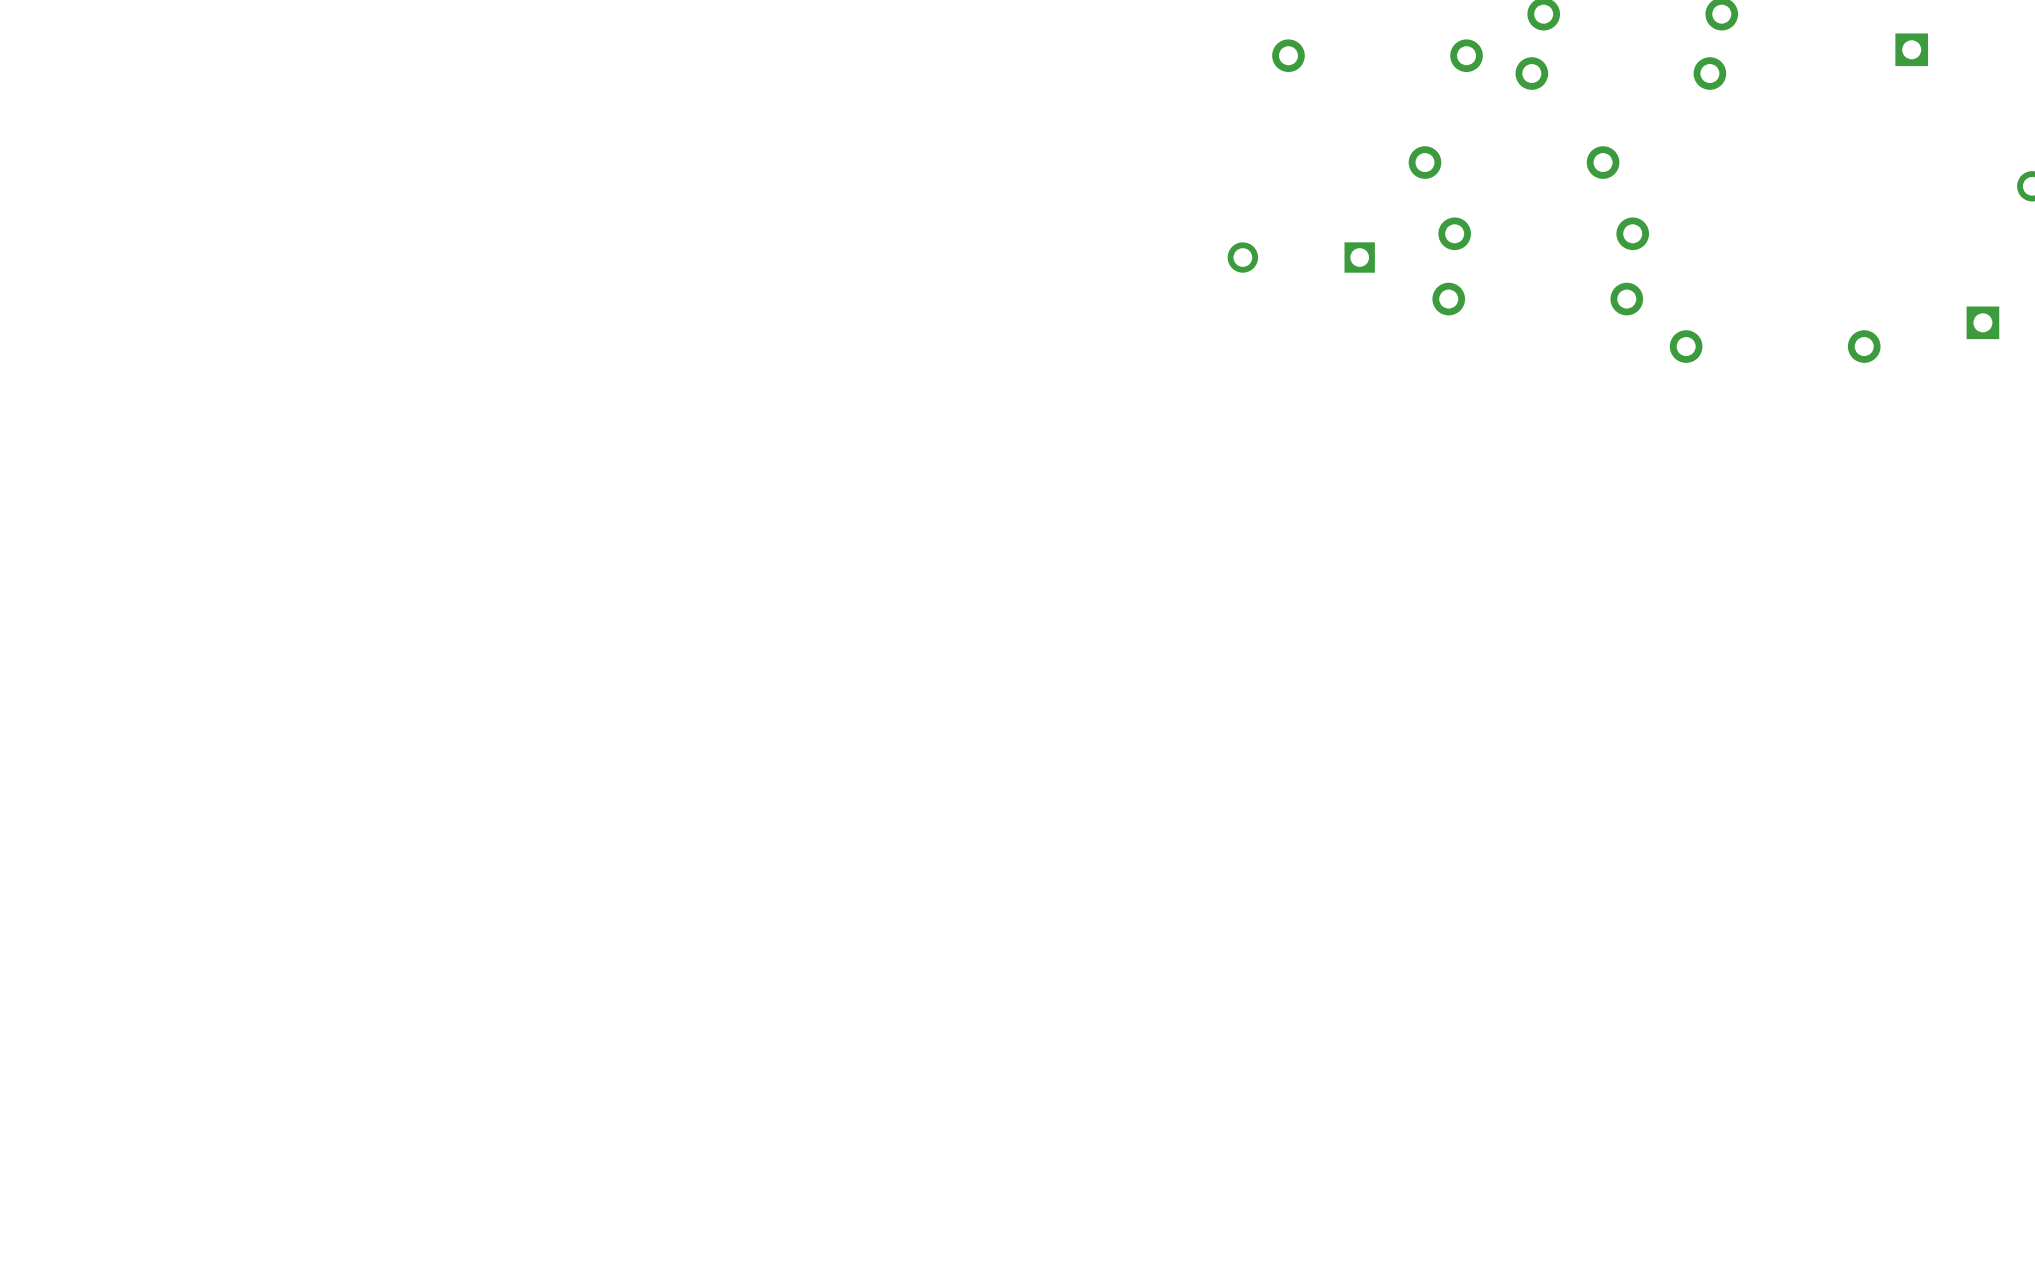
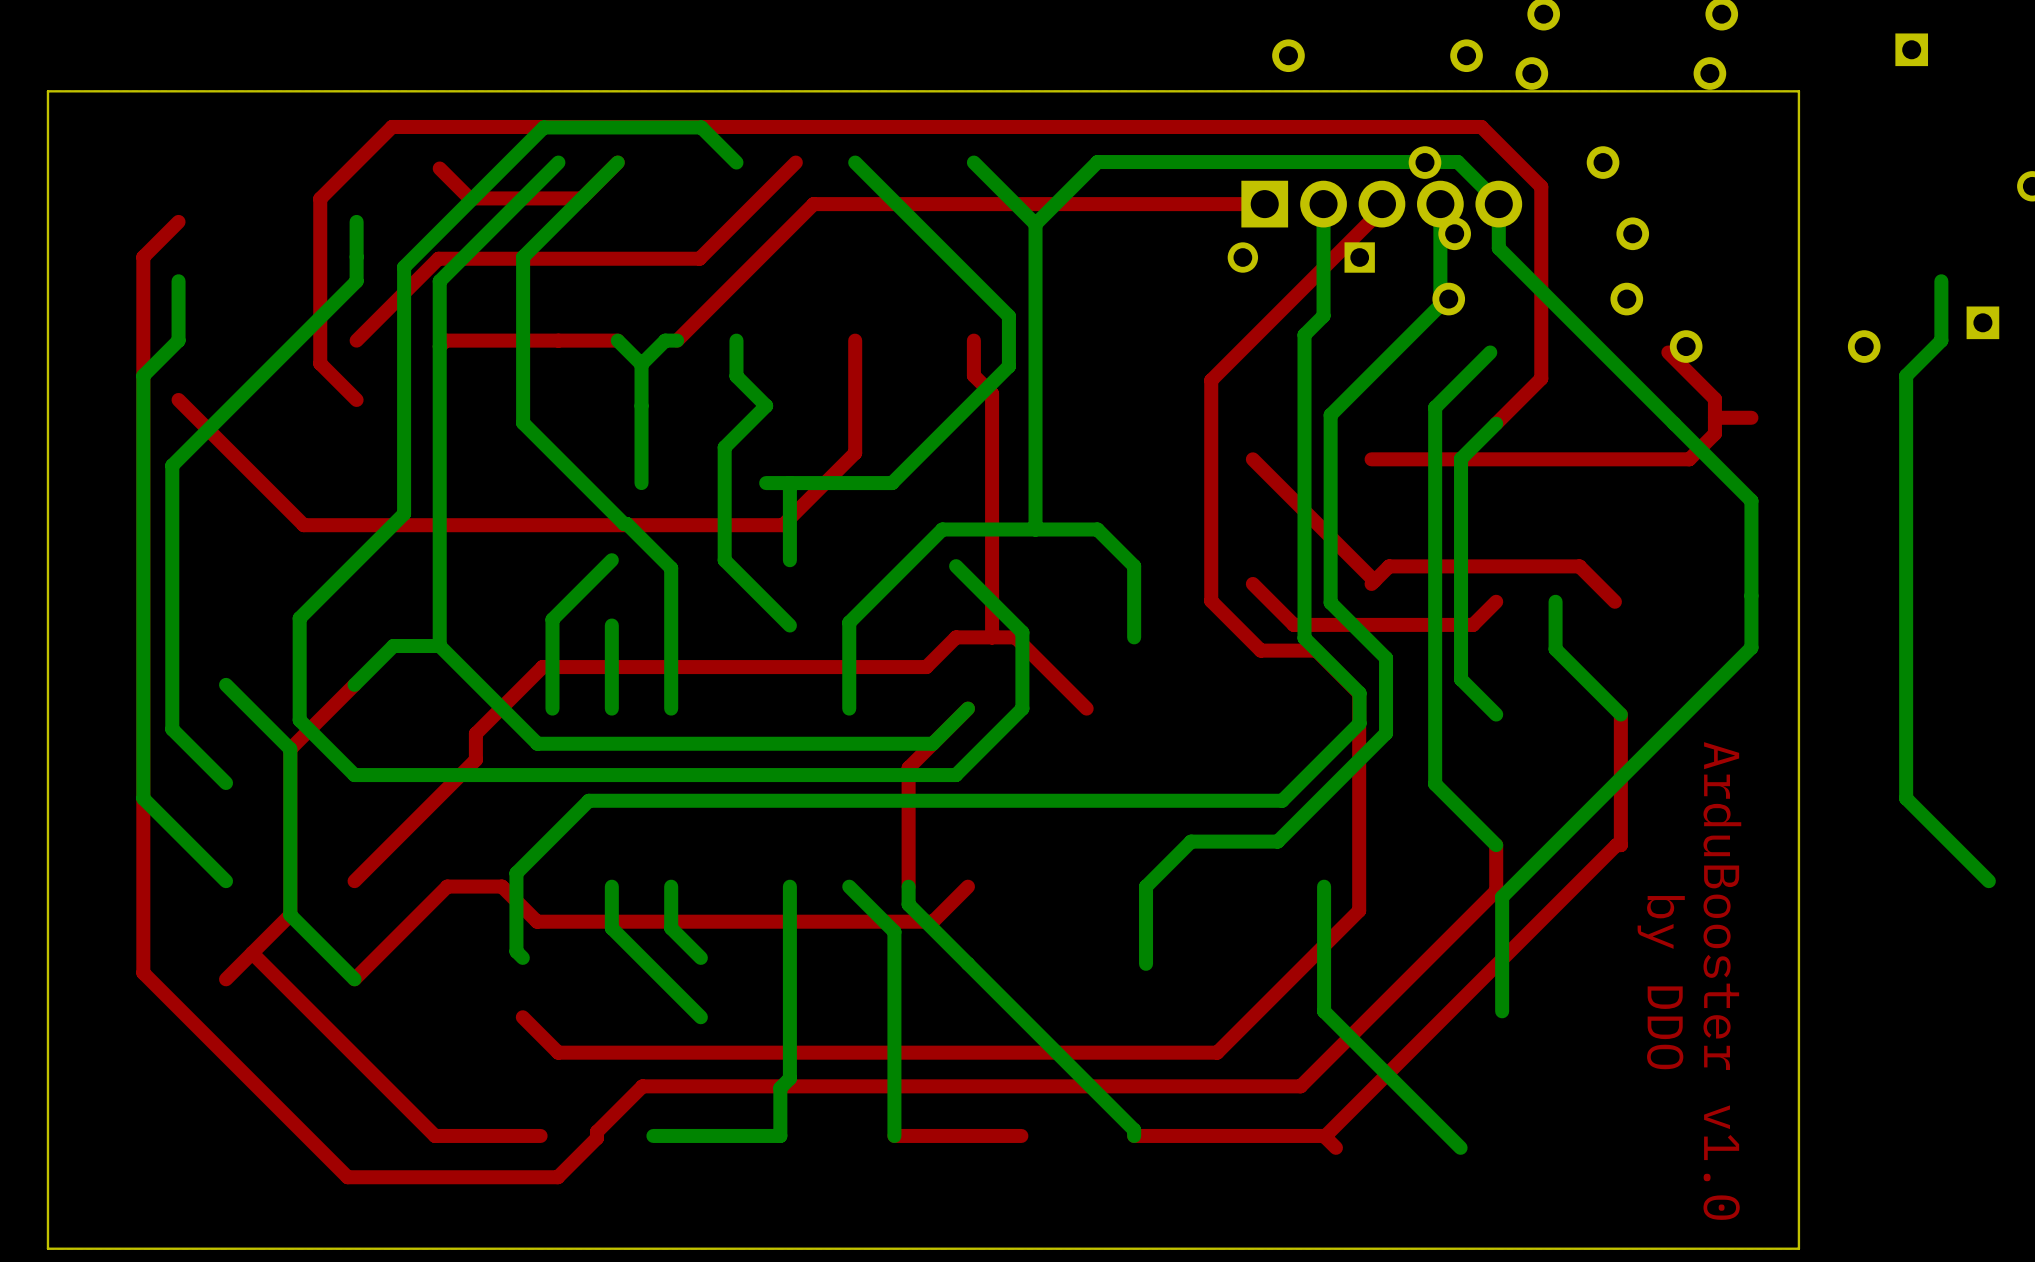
board edge: none -> (1798, 91) (1798, 1248) (47, 1248) (47, 91) (1798, 91)
bottom track: none -> (558, 162) (439, 281) (439, 646)
top track: none -> (617, 162) (581, 198) (469, 198) (439, 168)
bottom track: none -> (617, 162) (523, 257) (523, 423) (671, 568) (671, 708)
bottom track: none -> (736, 162) (701, 127) (543, 127) (404, 267) (404, 513) (299, 618) (299, 720) (354, 775) (955, 775) (1022, 708) (1022, 632) (956, 566)
top track: none -> (795, 162) (699, 258) (438, 258) (356, 340)
bottom track: none -> (855, 162) (1008, 316) (1008, 366) (892, 483) (766, 483)
bottom track: none -> (973, 162) (1035, 224)
top track: none -> (1264, 204) (813, 204) (677, 340)
bottom track: none -> (1323, 204) (1323, 315) (1304, 334) (1304, 638) (1359, 693) (1359, 723) (1282, 800) (588, 800) (516, 873) (516, 951) (522, 957)
top track: none -> (1381, 204) (1381, 209) (1211, 380) (1211, 600) (1260, 650) (1316, 650) (1359, 693) (1359, 910) (1217, 1052) (558, 1052) (522, 1017)
part: none -> (1381, 204)
bottom track: none -> (1440, 204) (1440, 305) (1330, 415) (1330, 602) (1386, 658) (1386, 733) (1277, 841) (1191, 841) (1146, 886) (1146, 963)
top track: none -> (178, 221) (143, 257) (143, 972) (347, 1177) (557, 1177) (597, 1138) (597, 1131) (642, 1086) (1300, 1086) (1496, 890) (1496, 845)
bottom track: none -> (356, 221) (356, 281) (172, 465) (172, 729) (226, 783)
bottom track: none -> (1035, 224) (1035, 529)
bottom track: none -> (1035, 224) (1097, 162) (1457, 162) (1498, 203) (1498, 248) (1751, 500) (1751, 647) (1502, 897) (1502, 1011)
bottom track: none -> (178, 281) (178, 340) (143, 375) (143, 798) (226, 881)
bottom track: none -> (1941, 281) (1941, 340) (1906, 375) (1906, 798) (1988, 881)
top track: none -> (617, 340) (445, 340) (439, 346)
bottom track: none -> (617, 340) (641, 364)
bottom track: none -> (677, 340) (665, 340) (641, 364)
bottom track: none -> (736, 340) (736, 376) (766, 405) (724, 447) (724, 560) (789, 625)
top track: none -> (855, 340) (855, 453) (783, 525) (303, 525) (178, 399)
top track: none -> (973, 340) (973, 375) (992, 393) (992, 637)
bottom track: none -> (1490, 352) (1435, 407) (1435, 784) (1496, 845)
top track: none -> (1668, 352) (1714, 399) (1714, 433) (1689, 459) (1371, 459)
bottom track: none -> (641, 364) (641, 483)
top track: none -> (356, 399) (320, 363) (320, 198) (392, 126) (1481, 126) (1541, 186) (1541, 378) (1496, 423)
top track: none -> (1751, 417) (1714, 417)
bottom track: none -> (1496, 423) (1461, 458) (1461, 679) (1496, 714)
top track: none -> (1252, 459) (1374, 581)
bottom track: none -> (789, 483) (789, 560)
bottom track: none -> (611, 560) (552, 619) (552, 708)
top track: none -> (1252, 583) (1293, 624) (1473, 624) (1496, 601)
top track: none -> (1371, 583) (1389, 566) (1579, 566) (1614, 601)
bottom track: none -> (1555, 601) (1555, 649) (1620, 714)
bottom track: none -> (611, 625) (611, 708)
bottom track: none -> (1134, 637) (1134, 566) (1097, 529) (942, 529) (849, 622) (849, 708)
bottom track: none -> (439, 646) (537, 743) (932, 743) (967, 708)
bottom track: none -> (439, 646) (393, 646) (354, 684)
bottom track: none -> (226, 684) (290, 749) (290, 915) (354, 979)
top track: none -> (354, 684) (290, 749) (290, 915) (226, 979)
top track: none -> (967, 708) (908, 767) (908, 886)
top track: none -> (1086, 708) (1015, 637) (956, 637) (926, 667) (542, 667) (475, 733) (475, 759) (354, 881)
top track: none -> (1620, 714) (1620, 845) (1616, 845) (1325, 1135)
bottom track: none -> (611, 886) (611, 928) (700, 1017)
bottom track: none -> (671, 886) (671, 928) (700, 957)
bottom track: none -> (789, 886) (789, 1078) (780, 1088) (780, 1135) (653, 1135)
bottom track: none -> (849, 886) (894, 931) (894, 1135)
bottom track: none -> (908, 886) (908, 904) (1134, 1130) (1134, 1135)
top track: none -> (967, 886) (932, 921) (537, 921) (501, 886) (447, 886) (354, 979)
bottom track: none -> (1324, 886) (1324, 1011) (1460, 1147)
top track: none -> (252, 953) (435, 1135) (540, 1135)
text: none -> ArduBooster v1.0 (1722, 981)
text: none -> by DDO (1661, 982)
top track: none -> (1021, 1135) (894, 1135)
top track: none -> (1325, 1135) (1134, 1135)
top track: none -> (1325, 1135) (1335, 1147)

